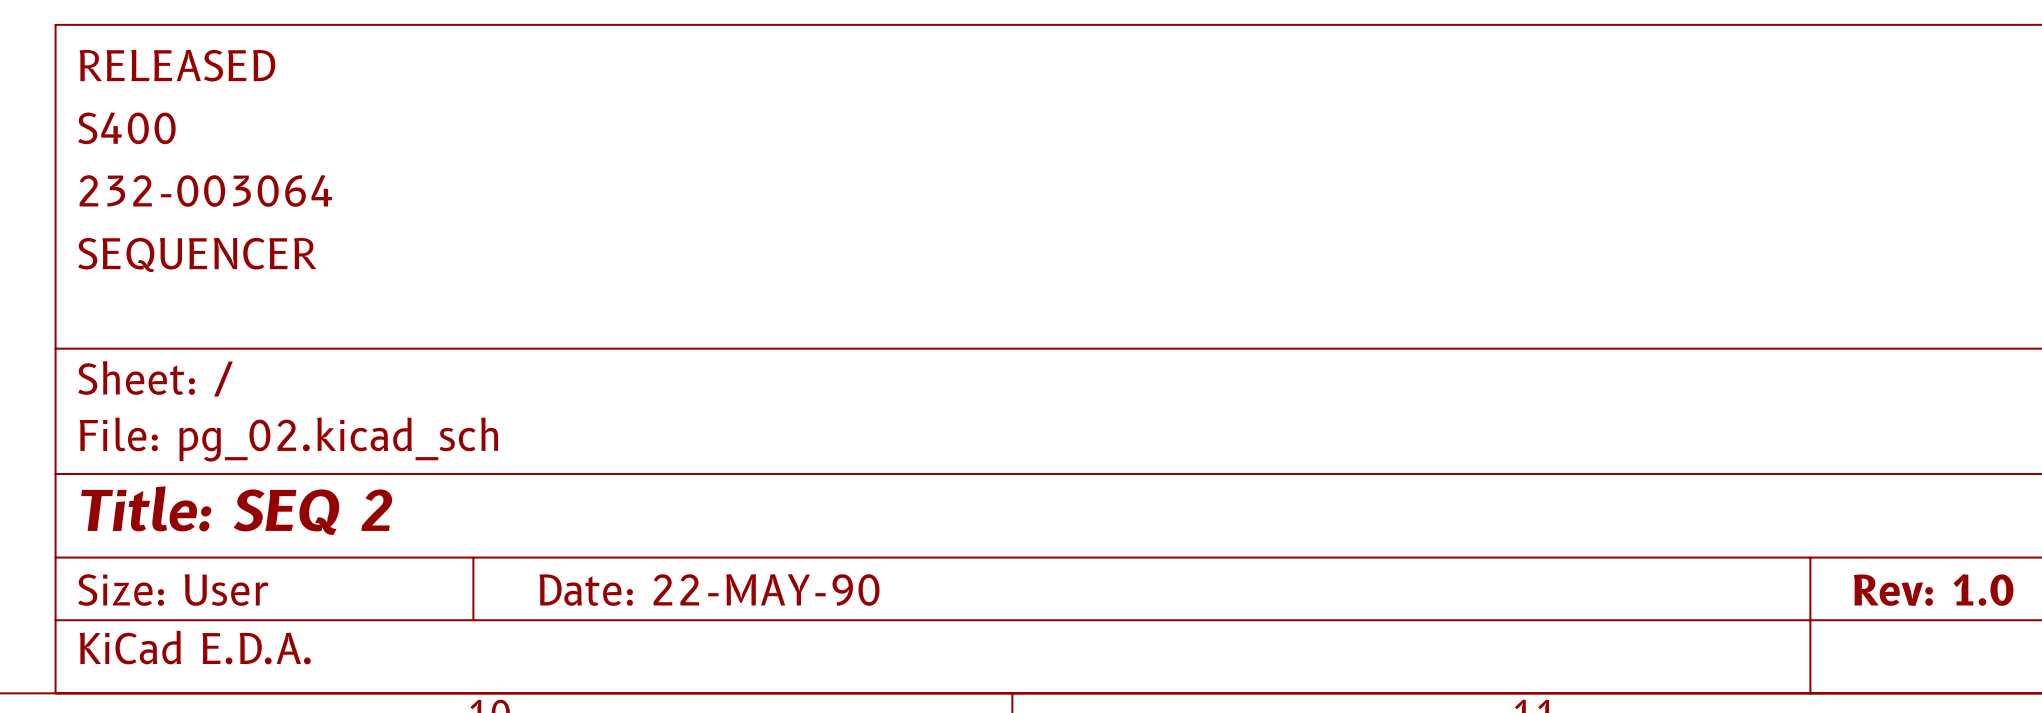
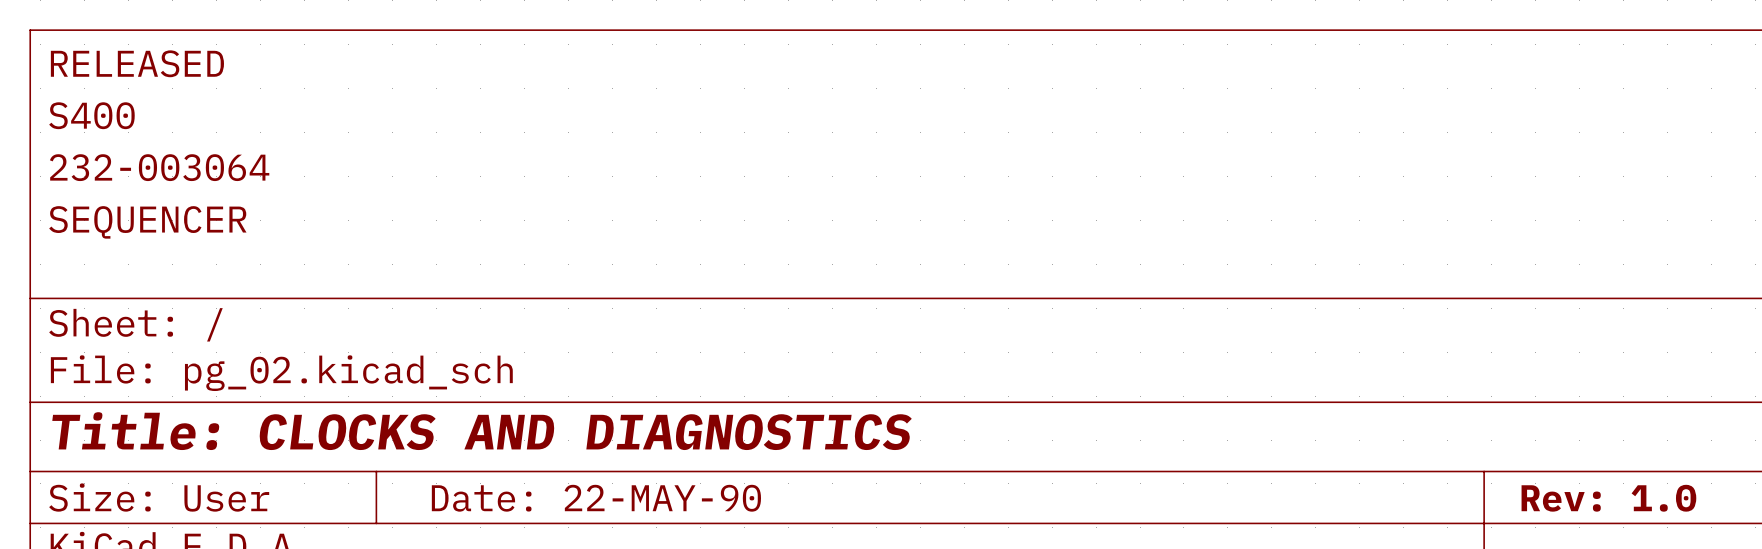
title block: Title: SEQ 2 (236, 510) -> Title: CLOCKS AND DIAGNOSTICS (482, 431)

